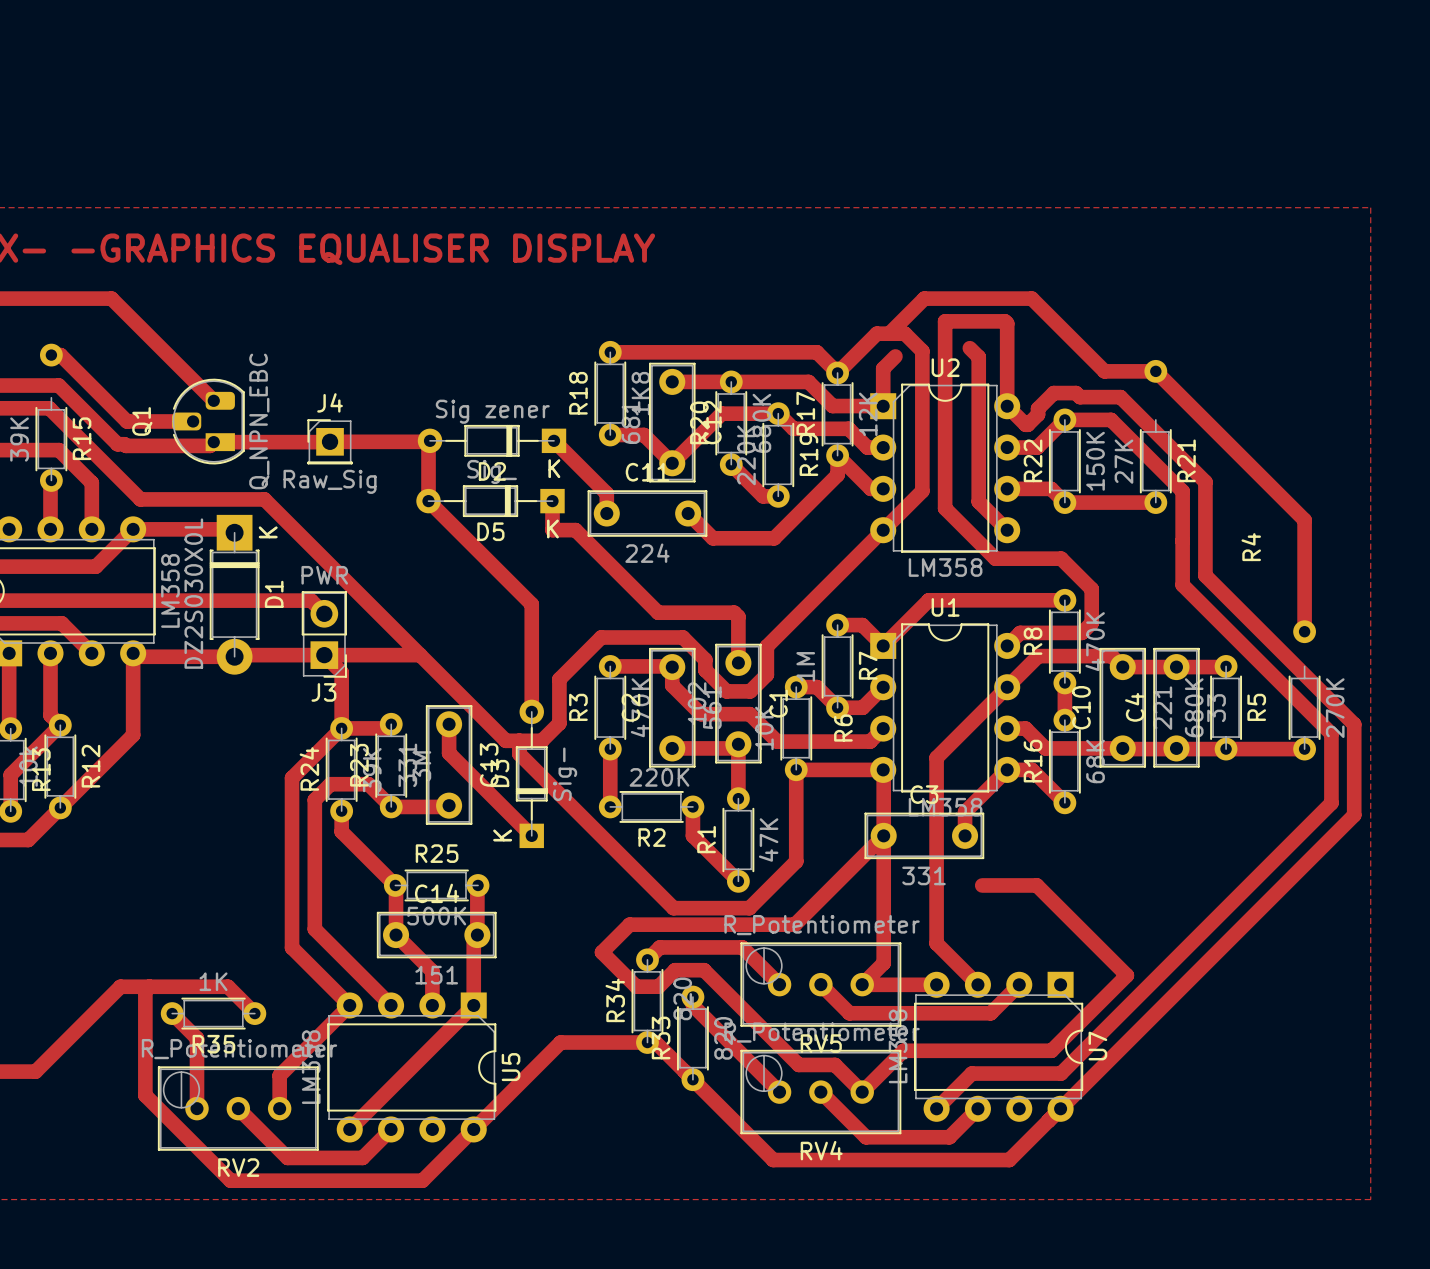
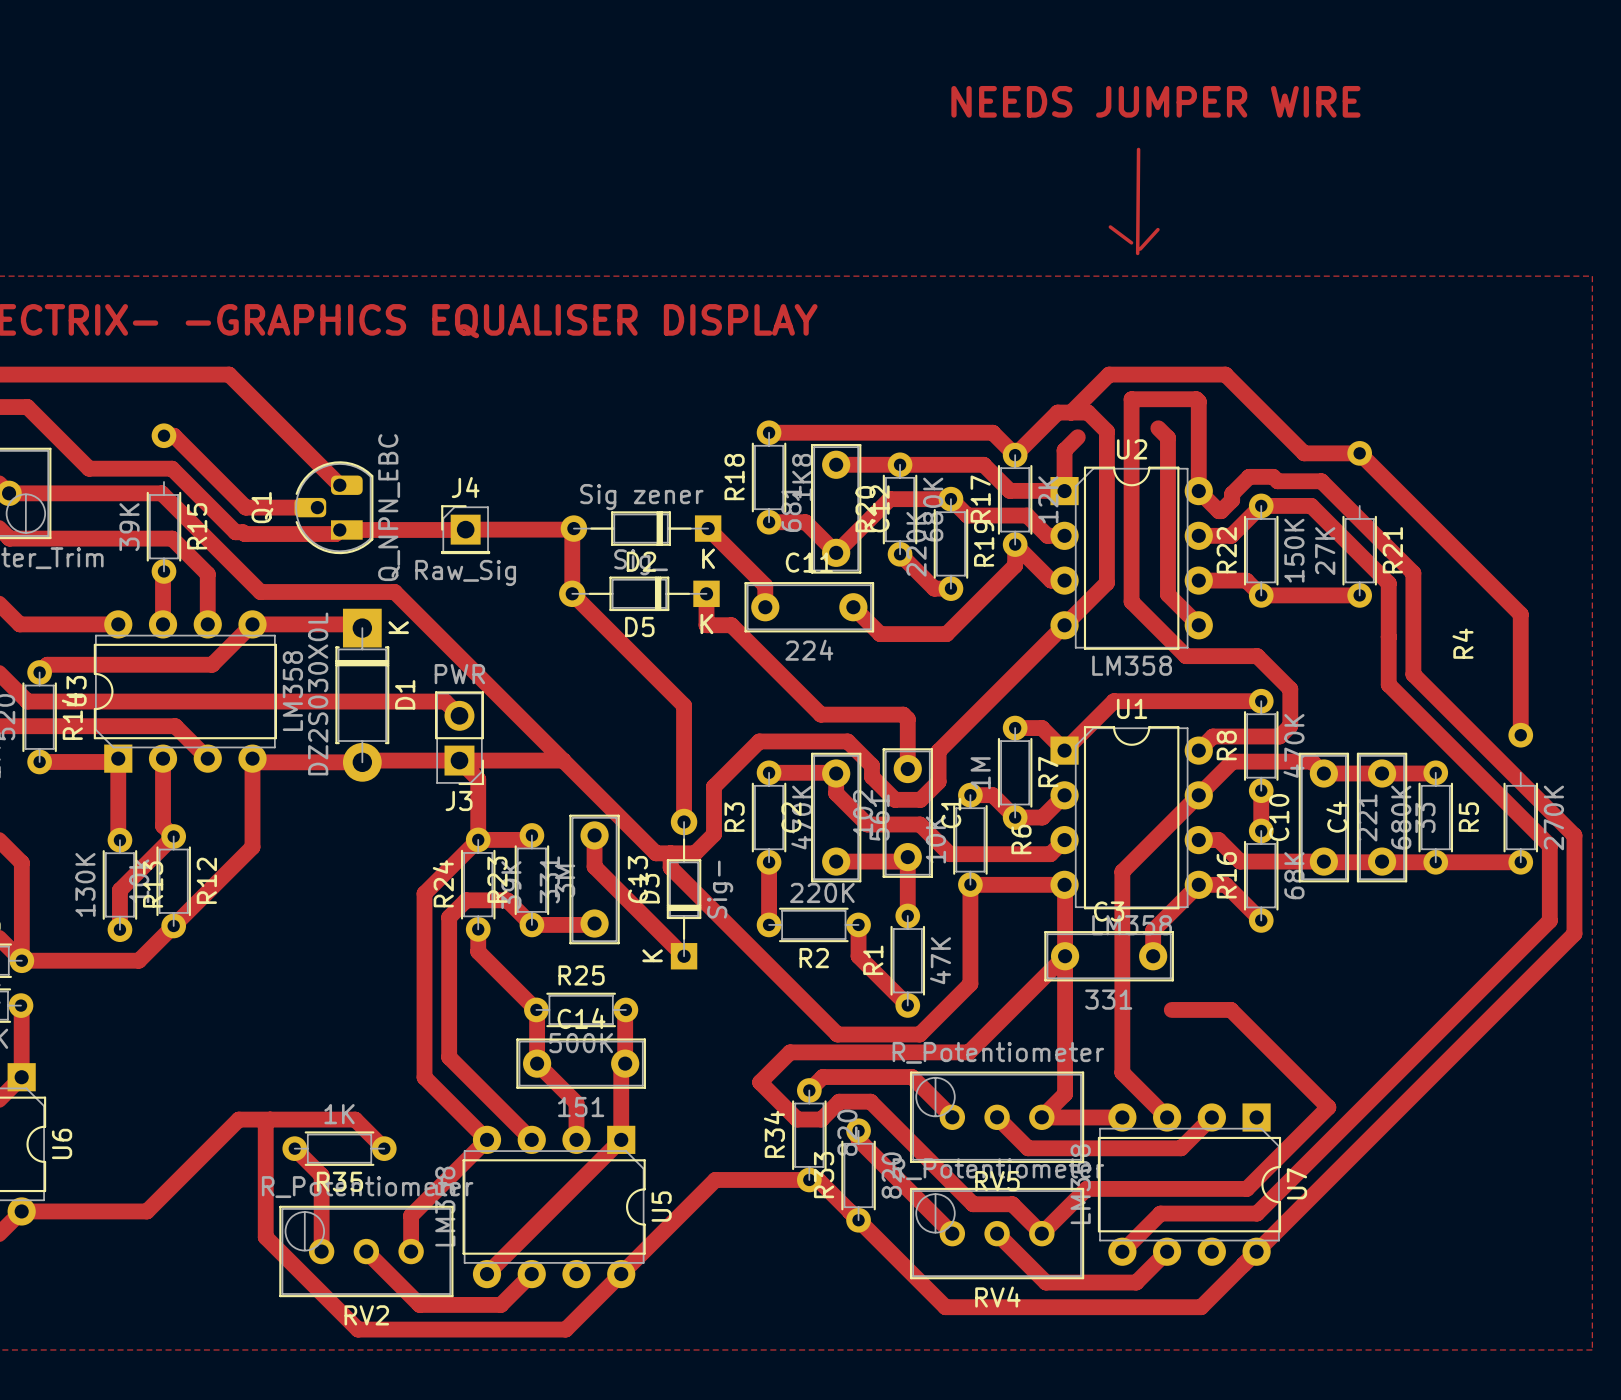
text: none -> NEEDS JUMPER WIRE (1155, 101)
track: none -> (1138, 149) (1137, 253)
track: none -> (1110, 226) (1131, 242)
track: none -> (1157, 229) (1140, 249)

